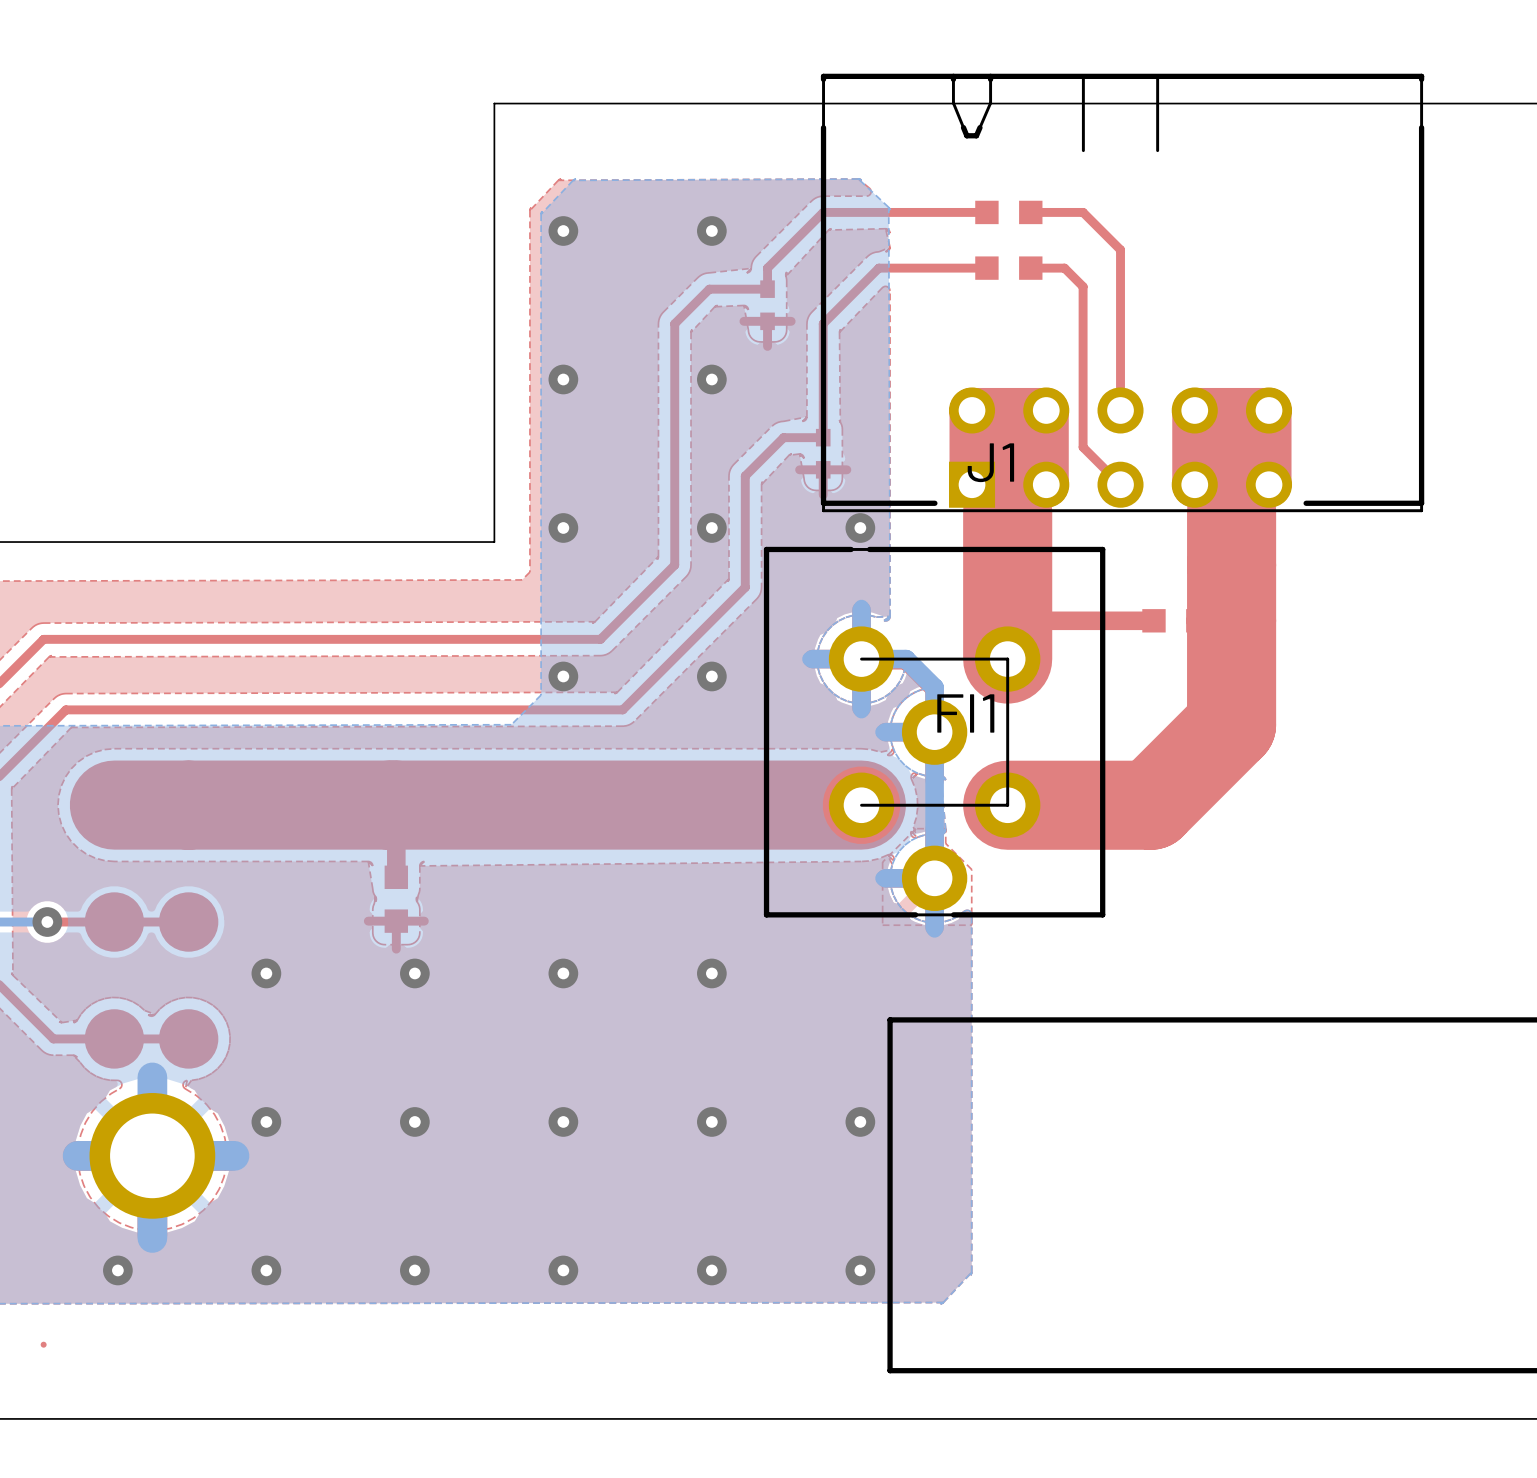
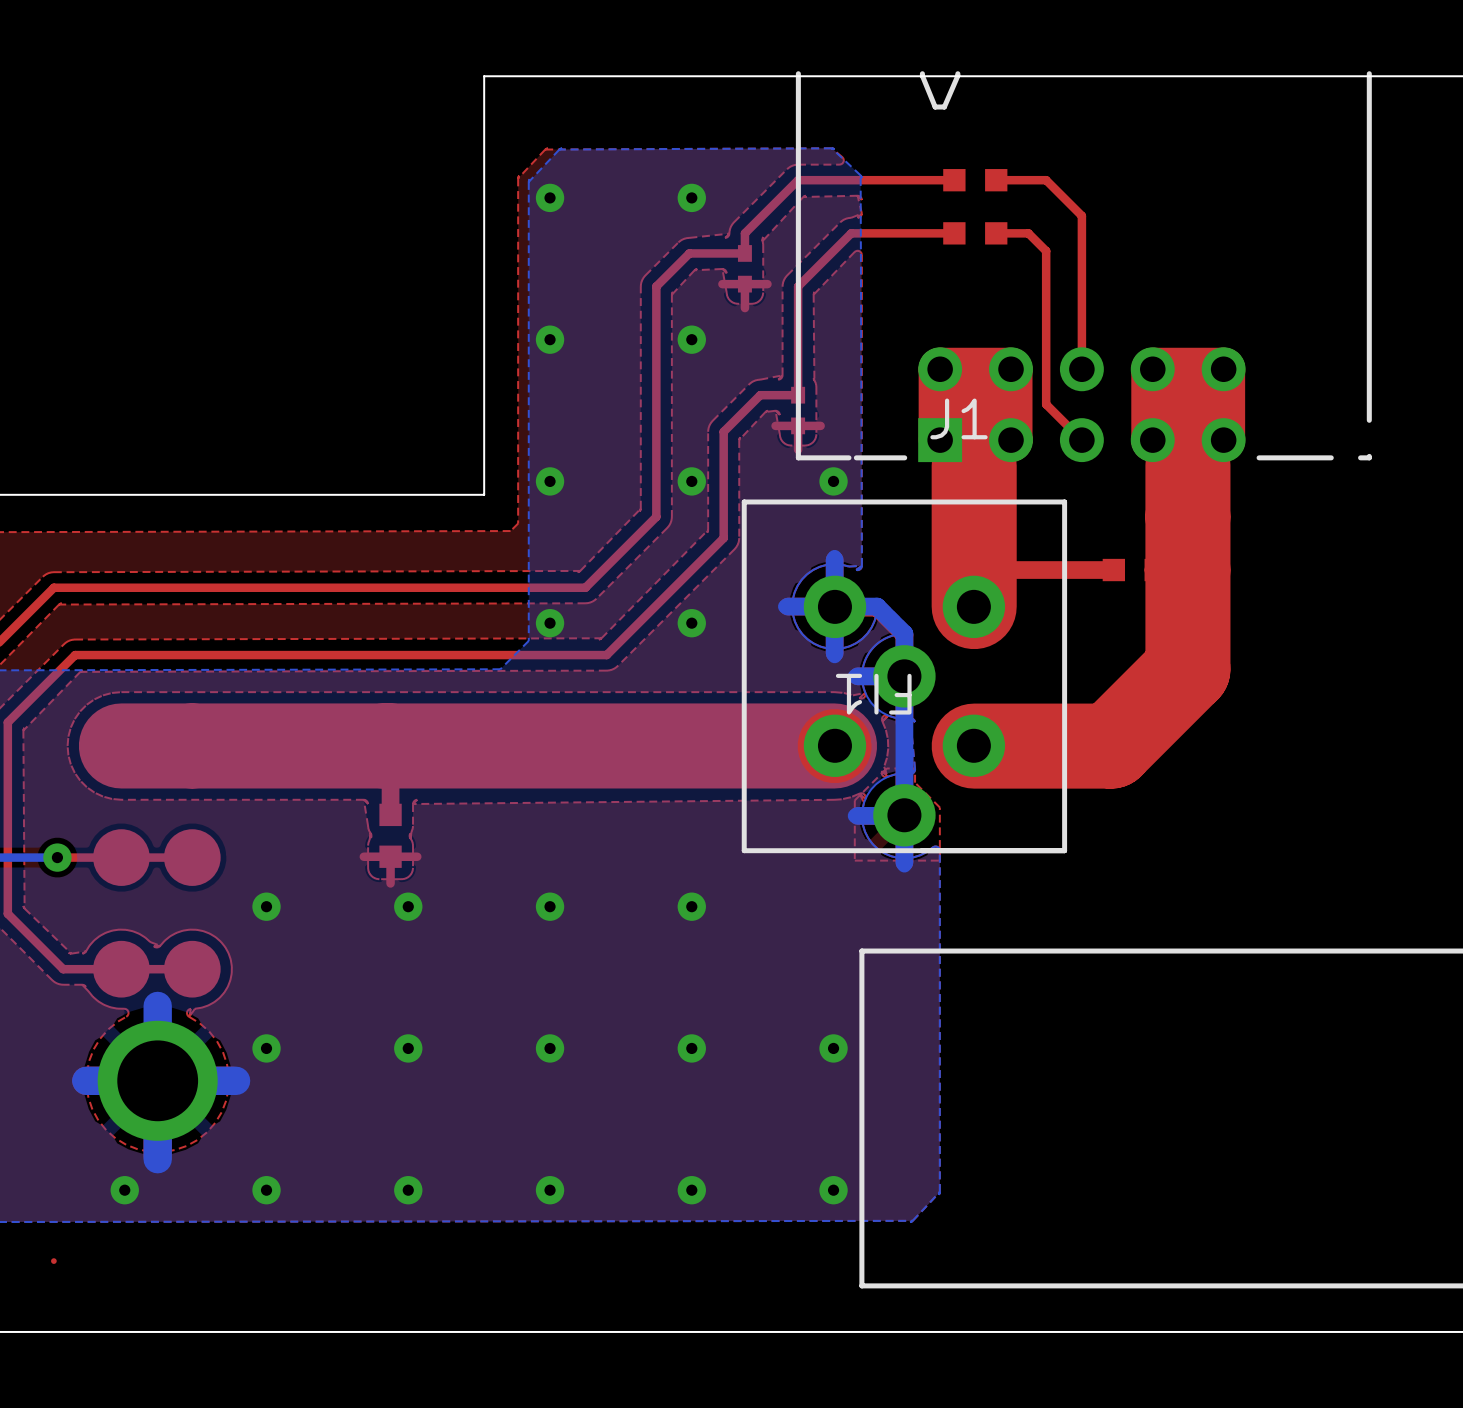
J1 footprint: [820, 73, 1425, 513] -> [795, 71, 1372, 463]
FI1 footprint: [763, 546, 1106, 918] -> [741, 499, 1068, 854]
FI1 name position: FI1 (965, 713) -> FI1 (873, 694)

